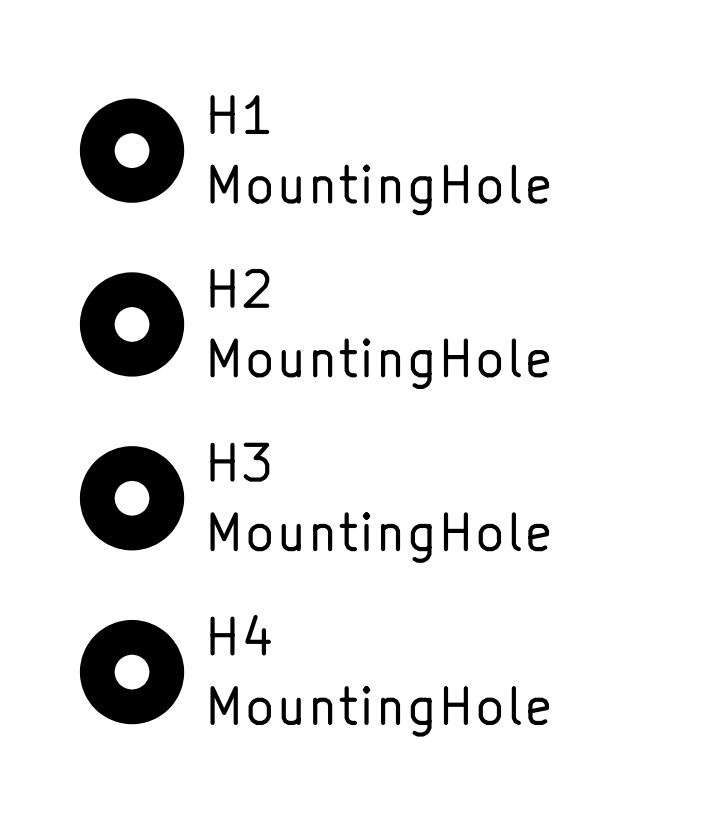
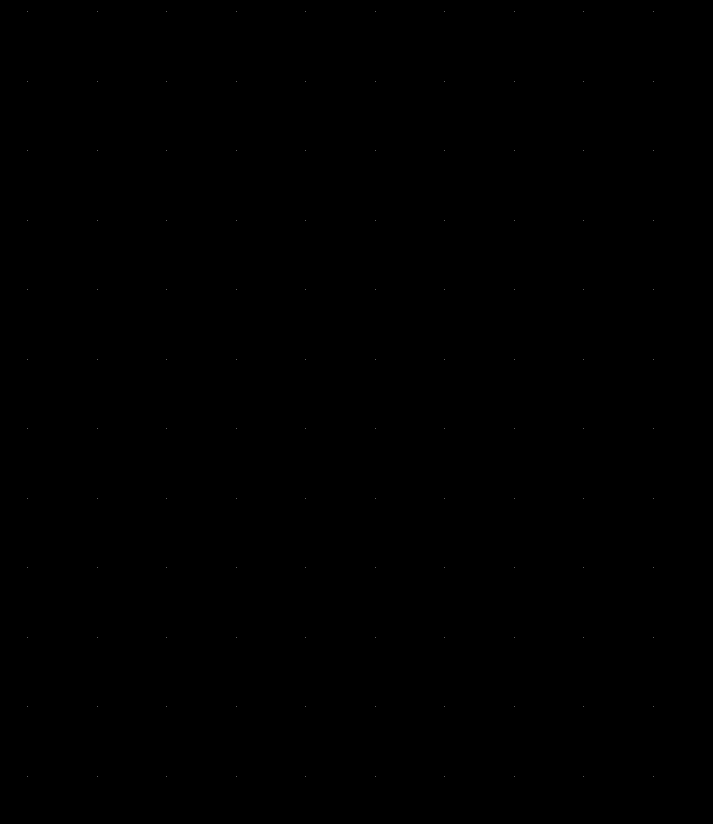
H1: MountingHole (132, 150) -> none
H2: MountingHole (132, 324) -> none
H3: MountingHole (132, 498) -> none
H4: MountingHole (132, 672) -> none

